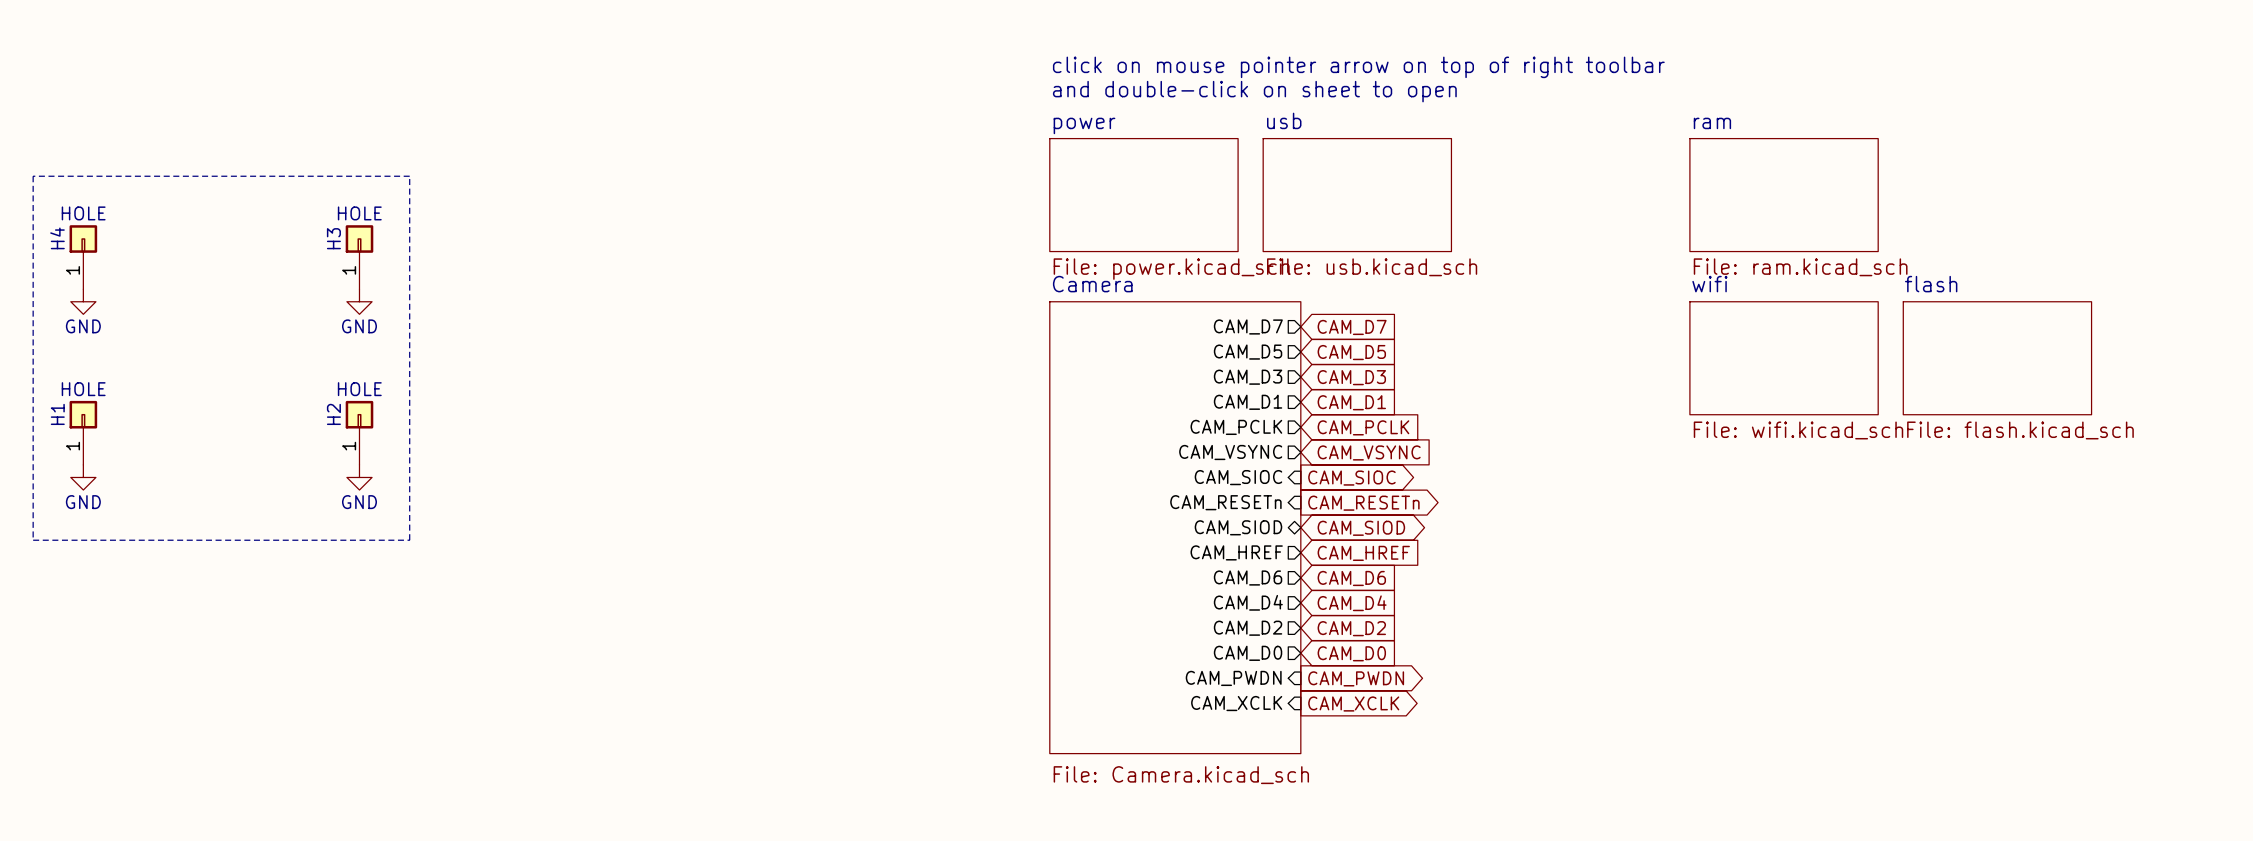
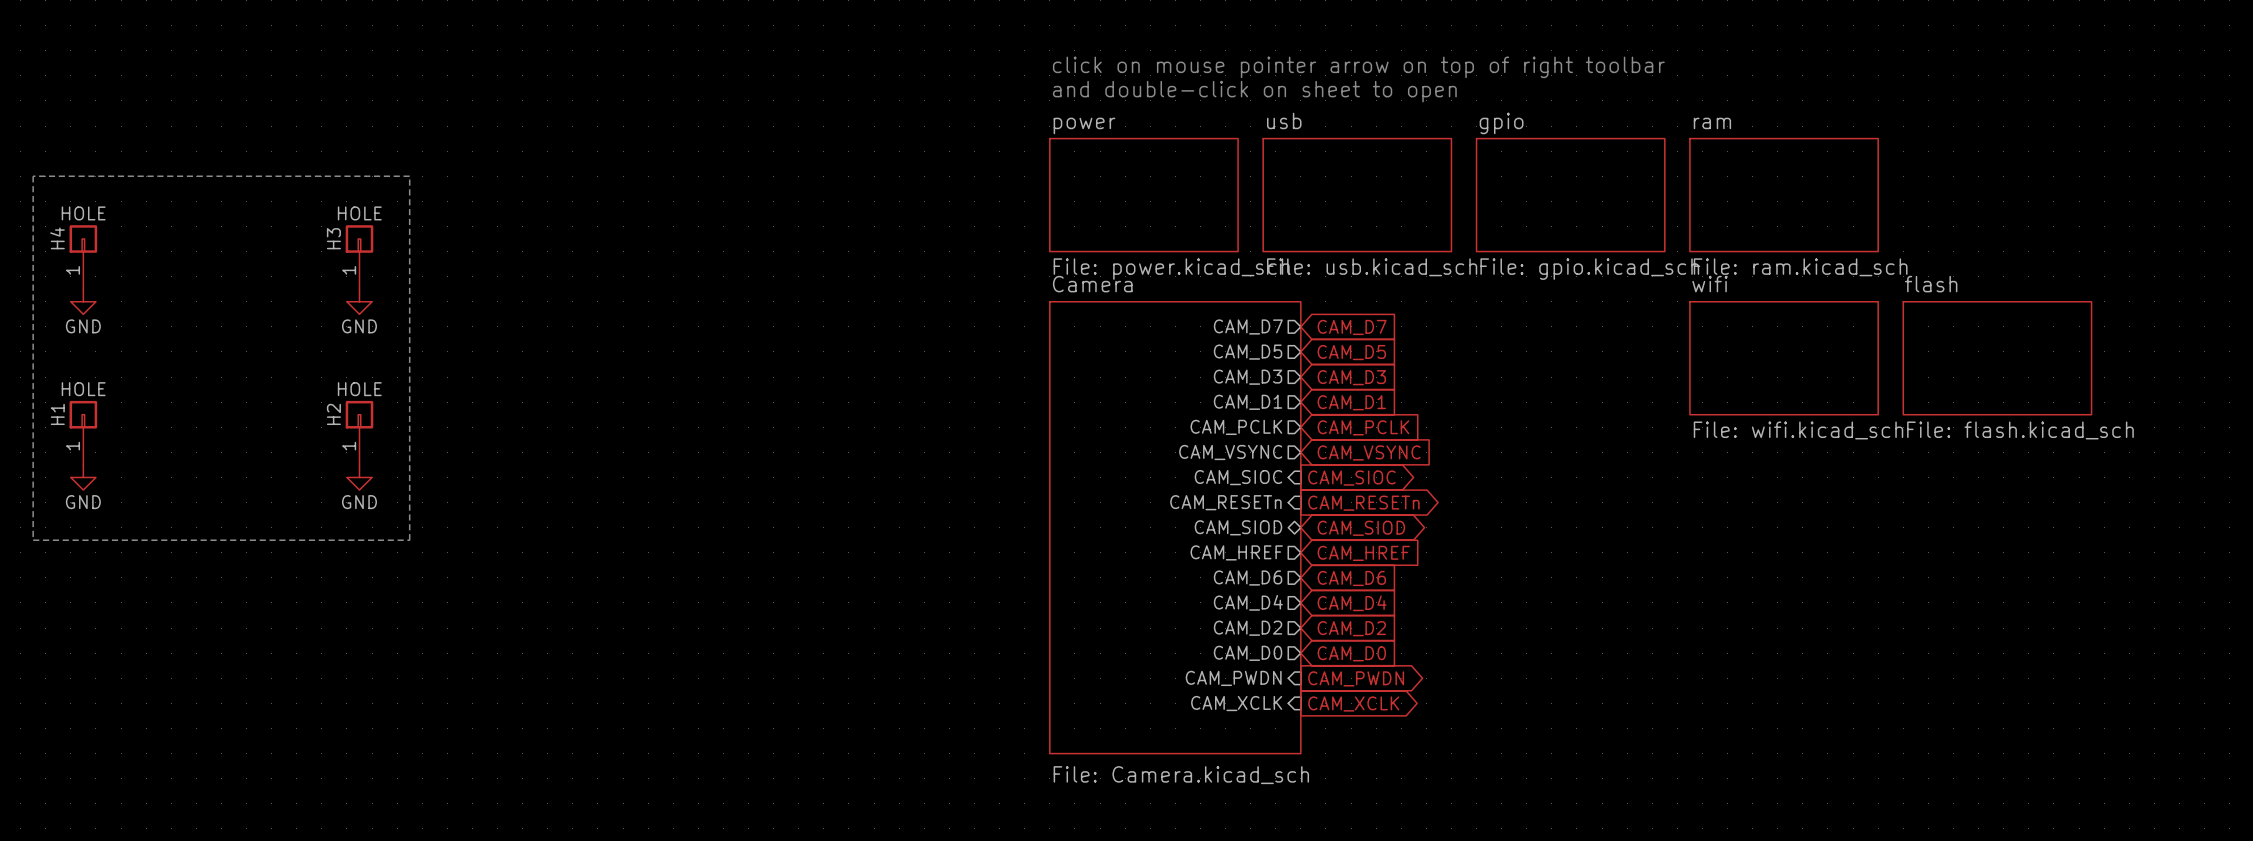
sheet gpio: none -> File: gpio.kicad_sch (1570, 195)

